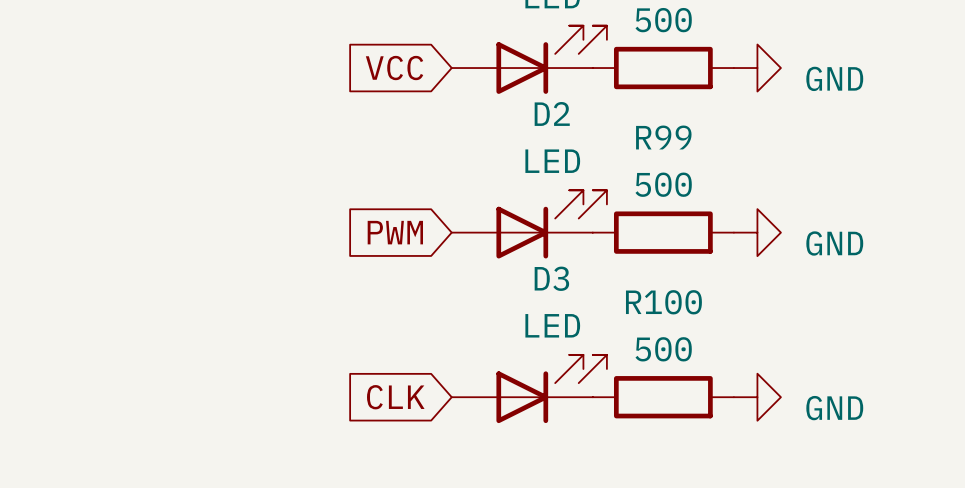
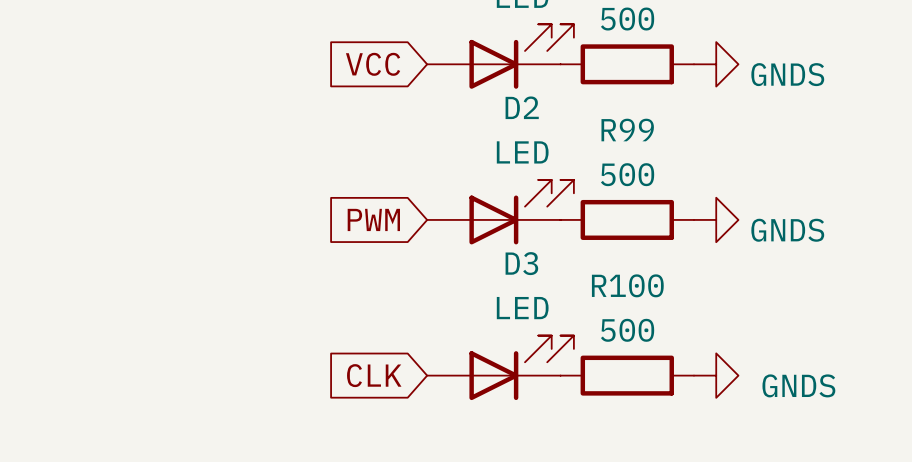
power symbol: GND (757, 68) -> GNDS (716, 64)
power symbol: GND (757, 232) -> GNDS (716, 219)
power symbol: GND (757, 397) -> GNDS (716, 375)

